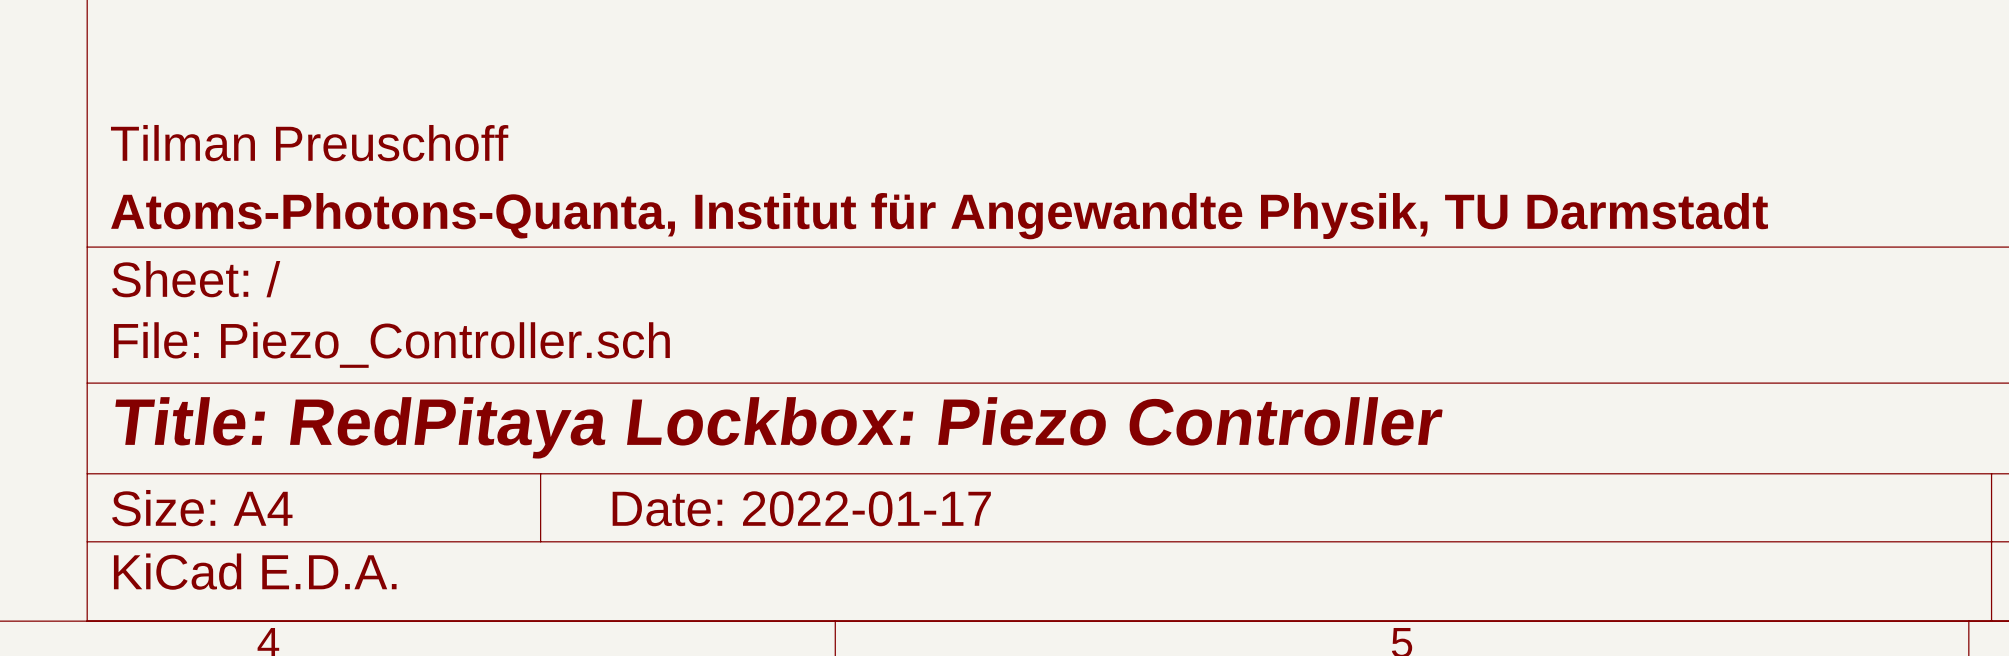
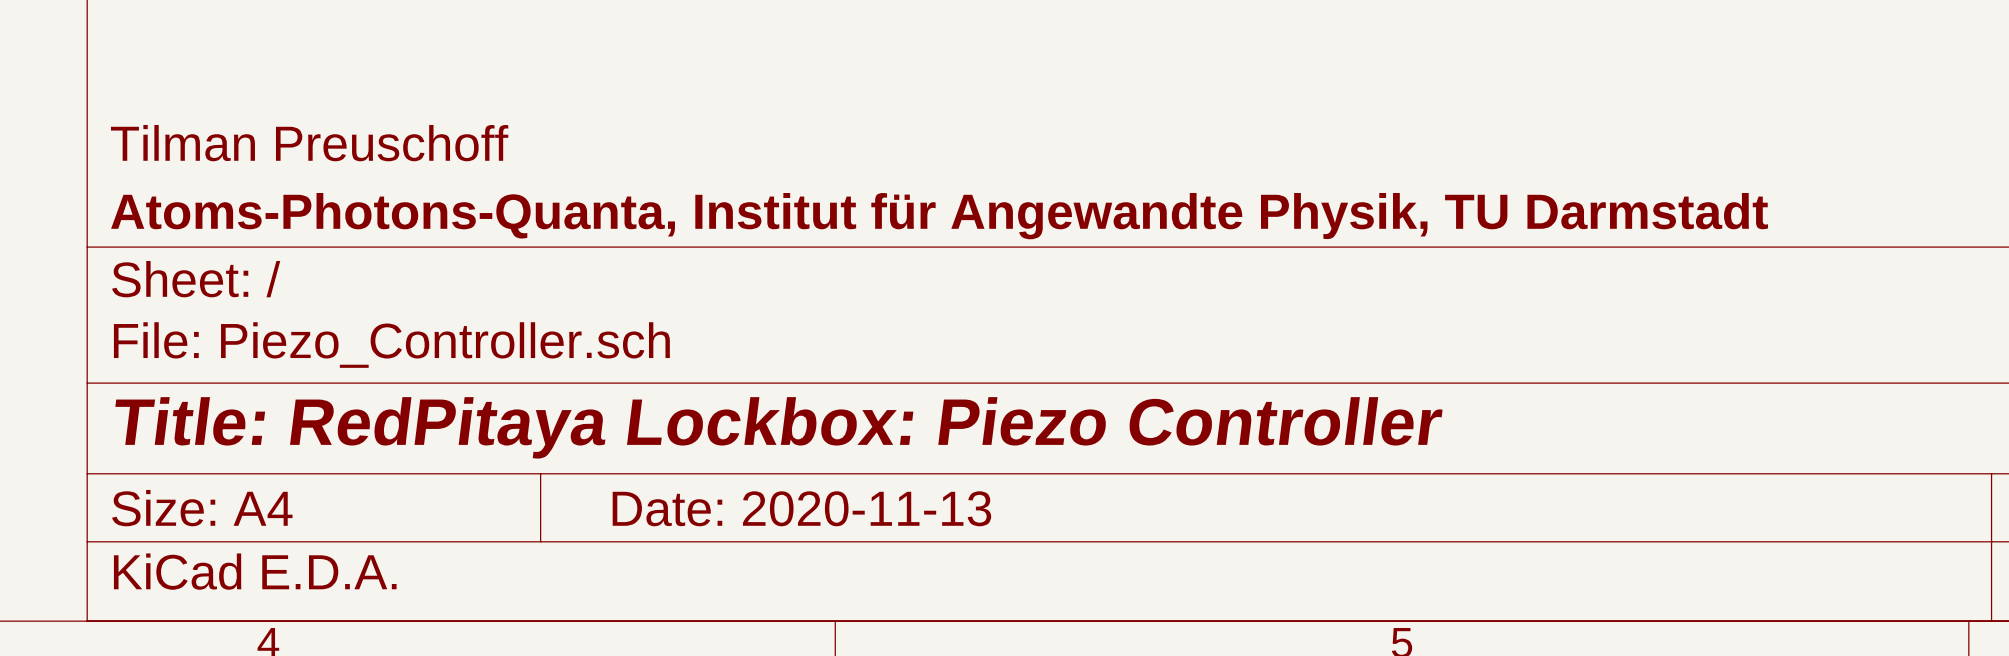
title block: Date: 2022-01-17 (801, 508) -> Date: 2020-11-13 (801, 508)

